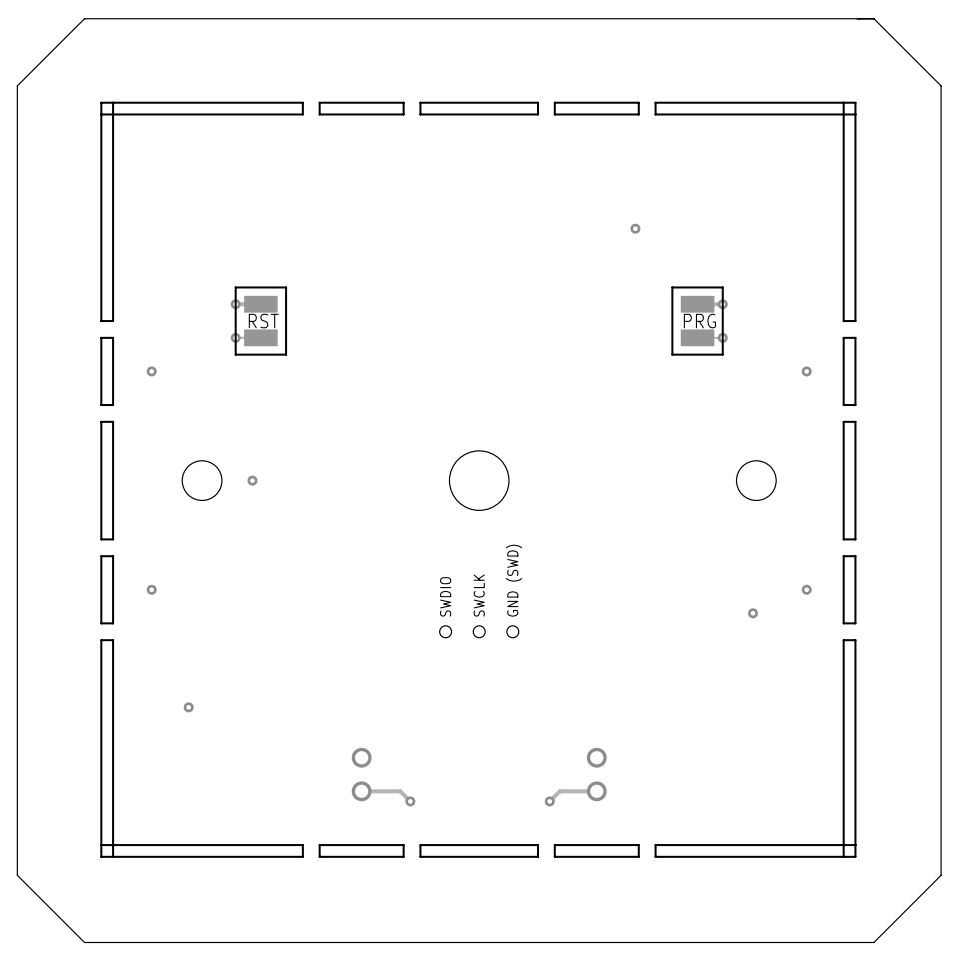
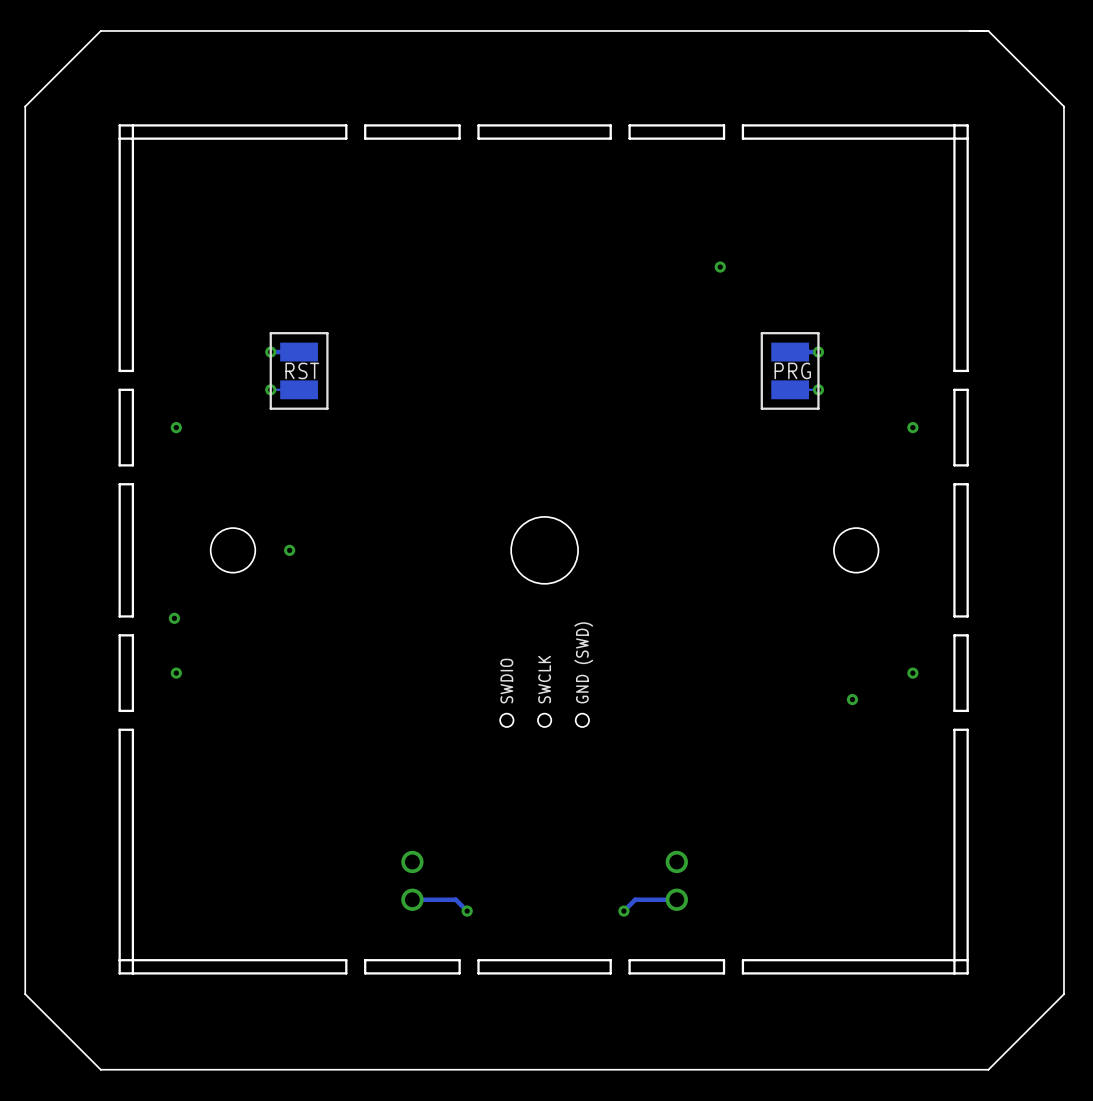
via: none -> (174, 618)
via: (188, 707) -> none

